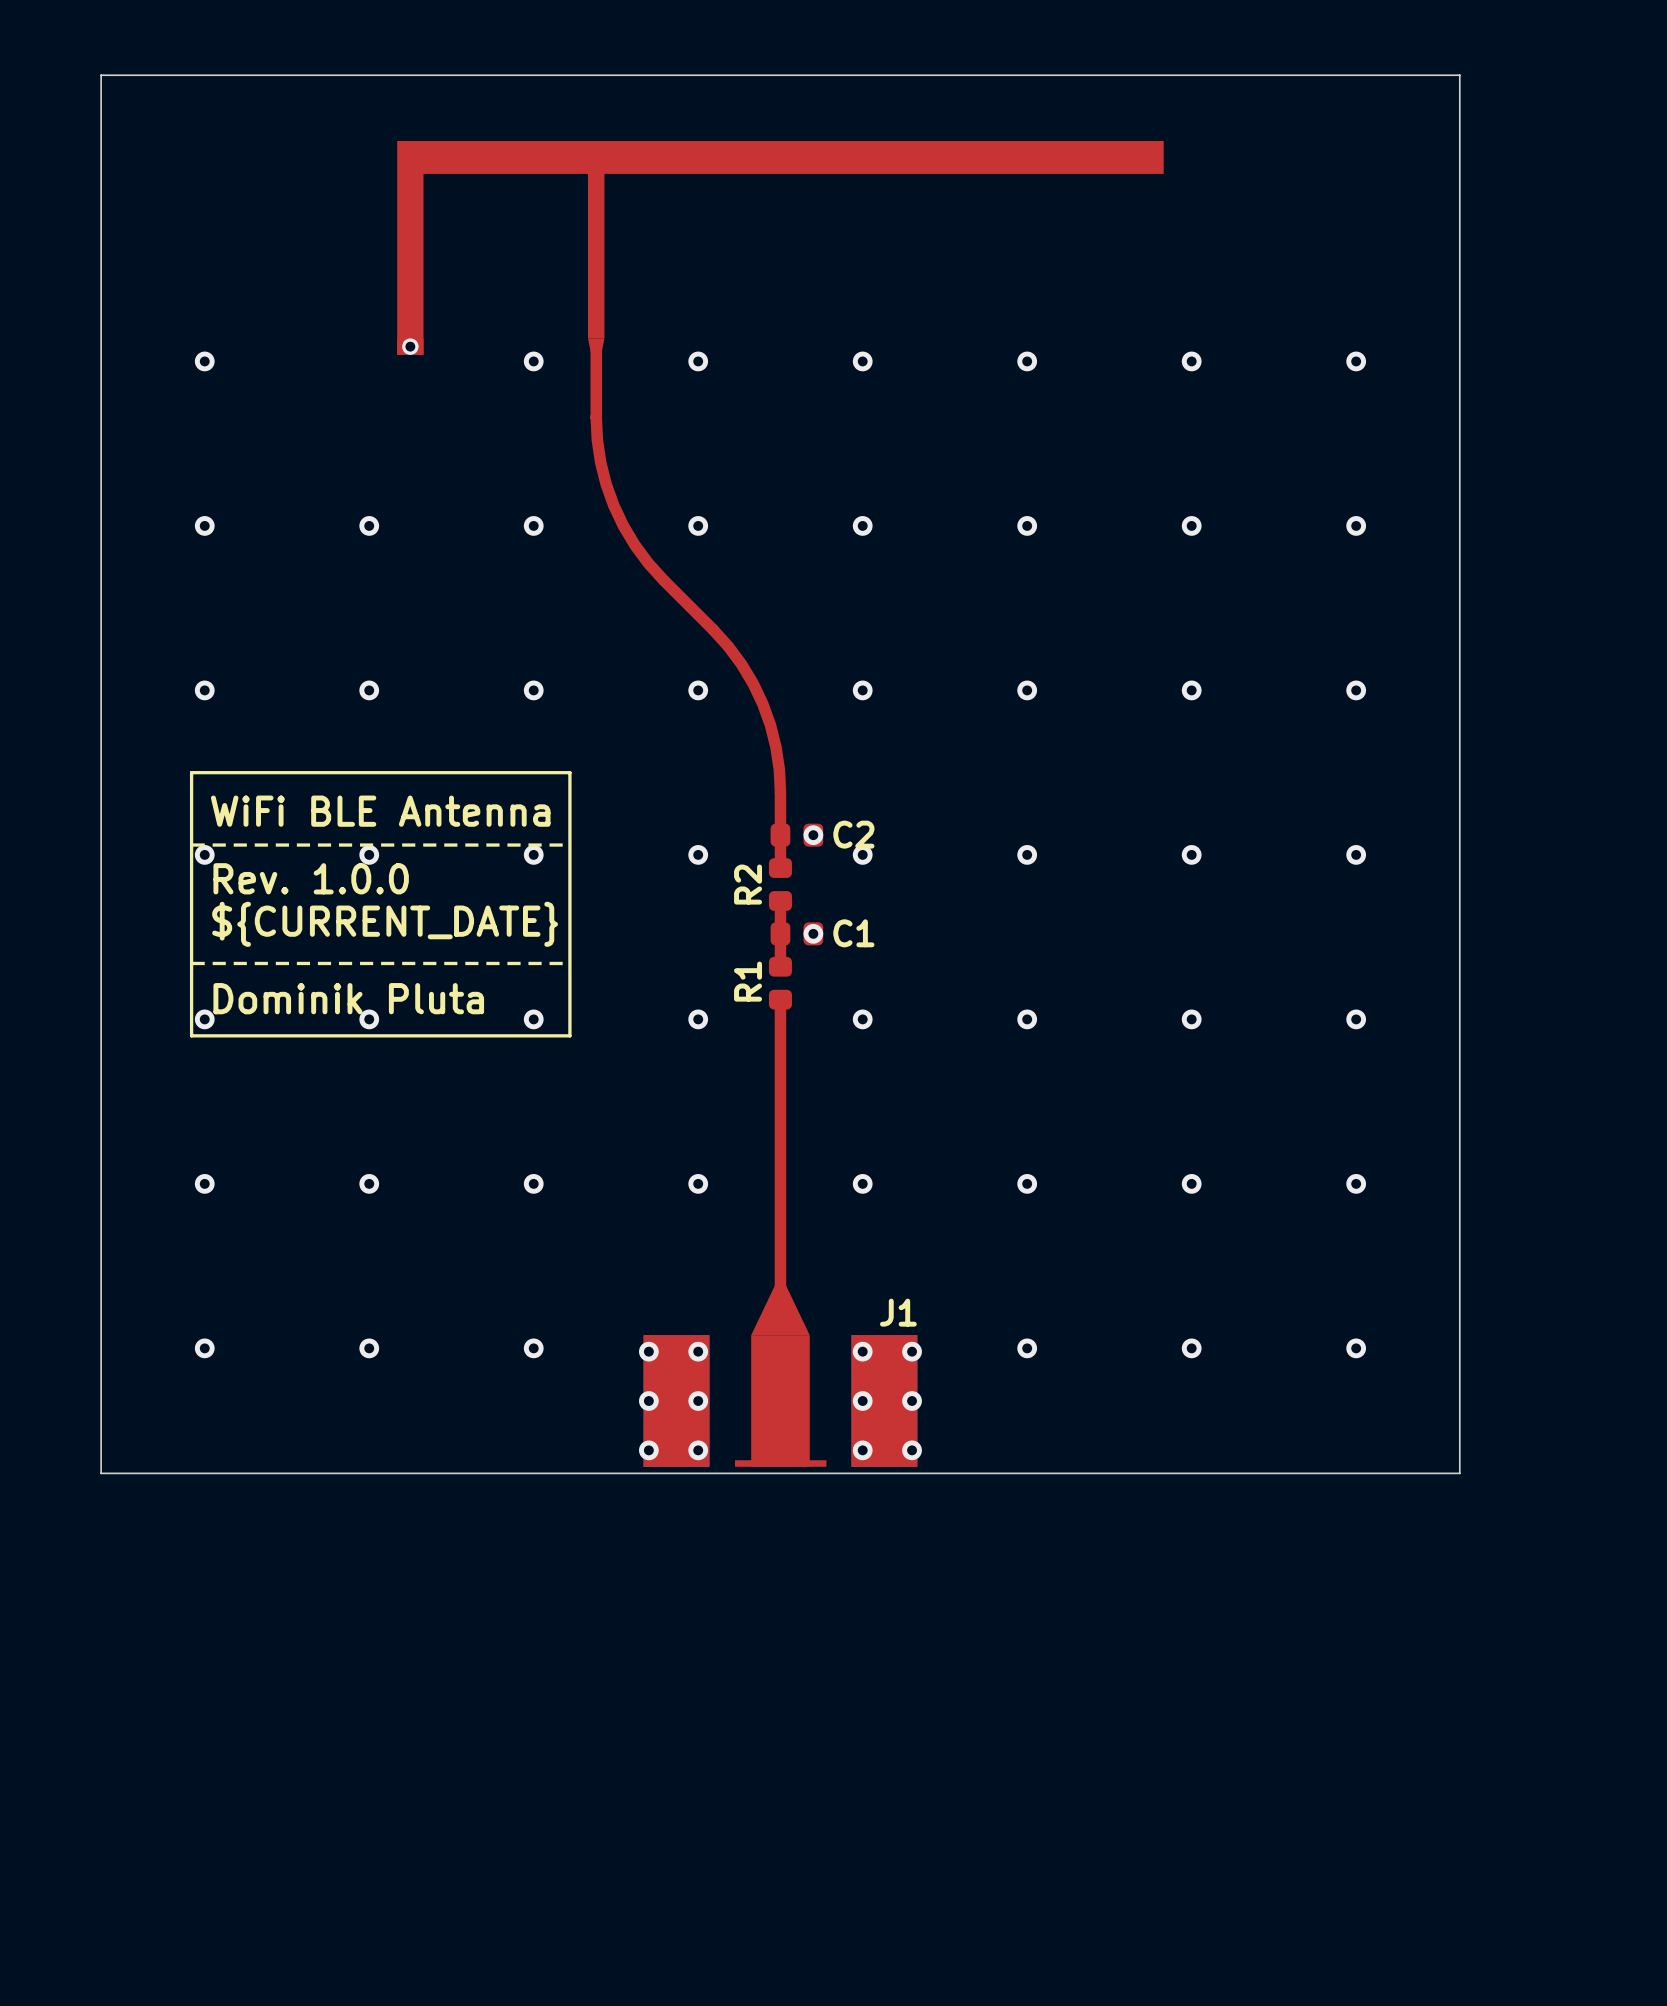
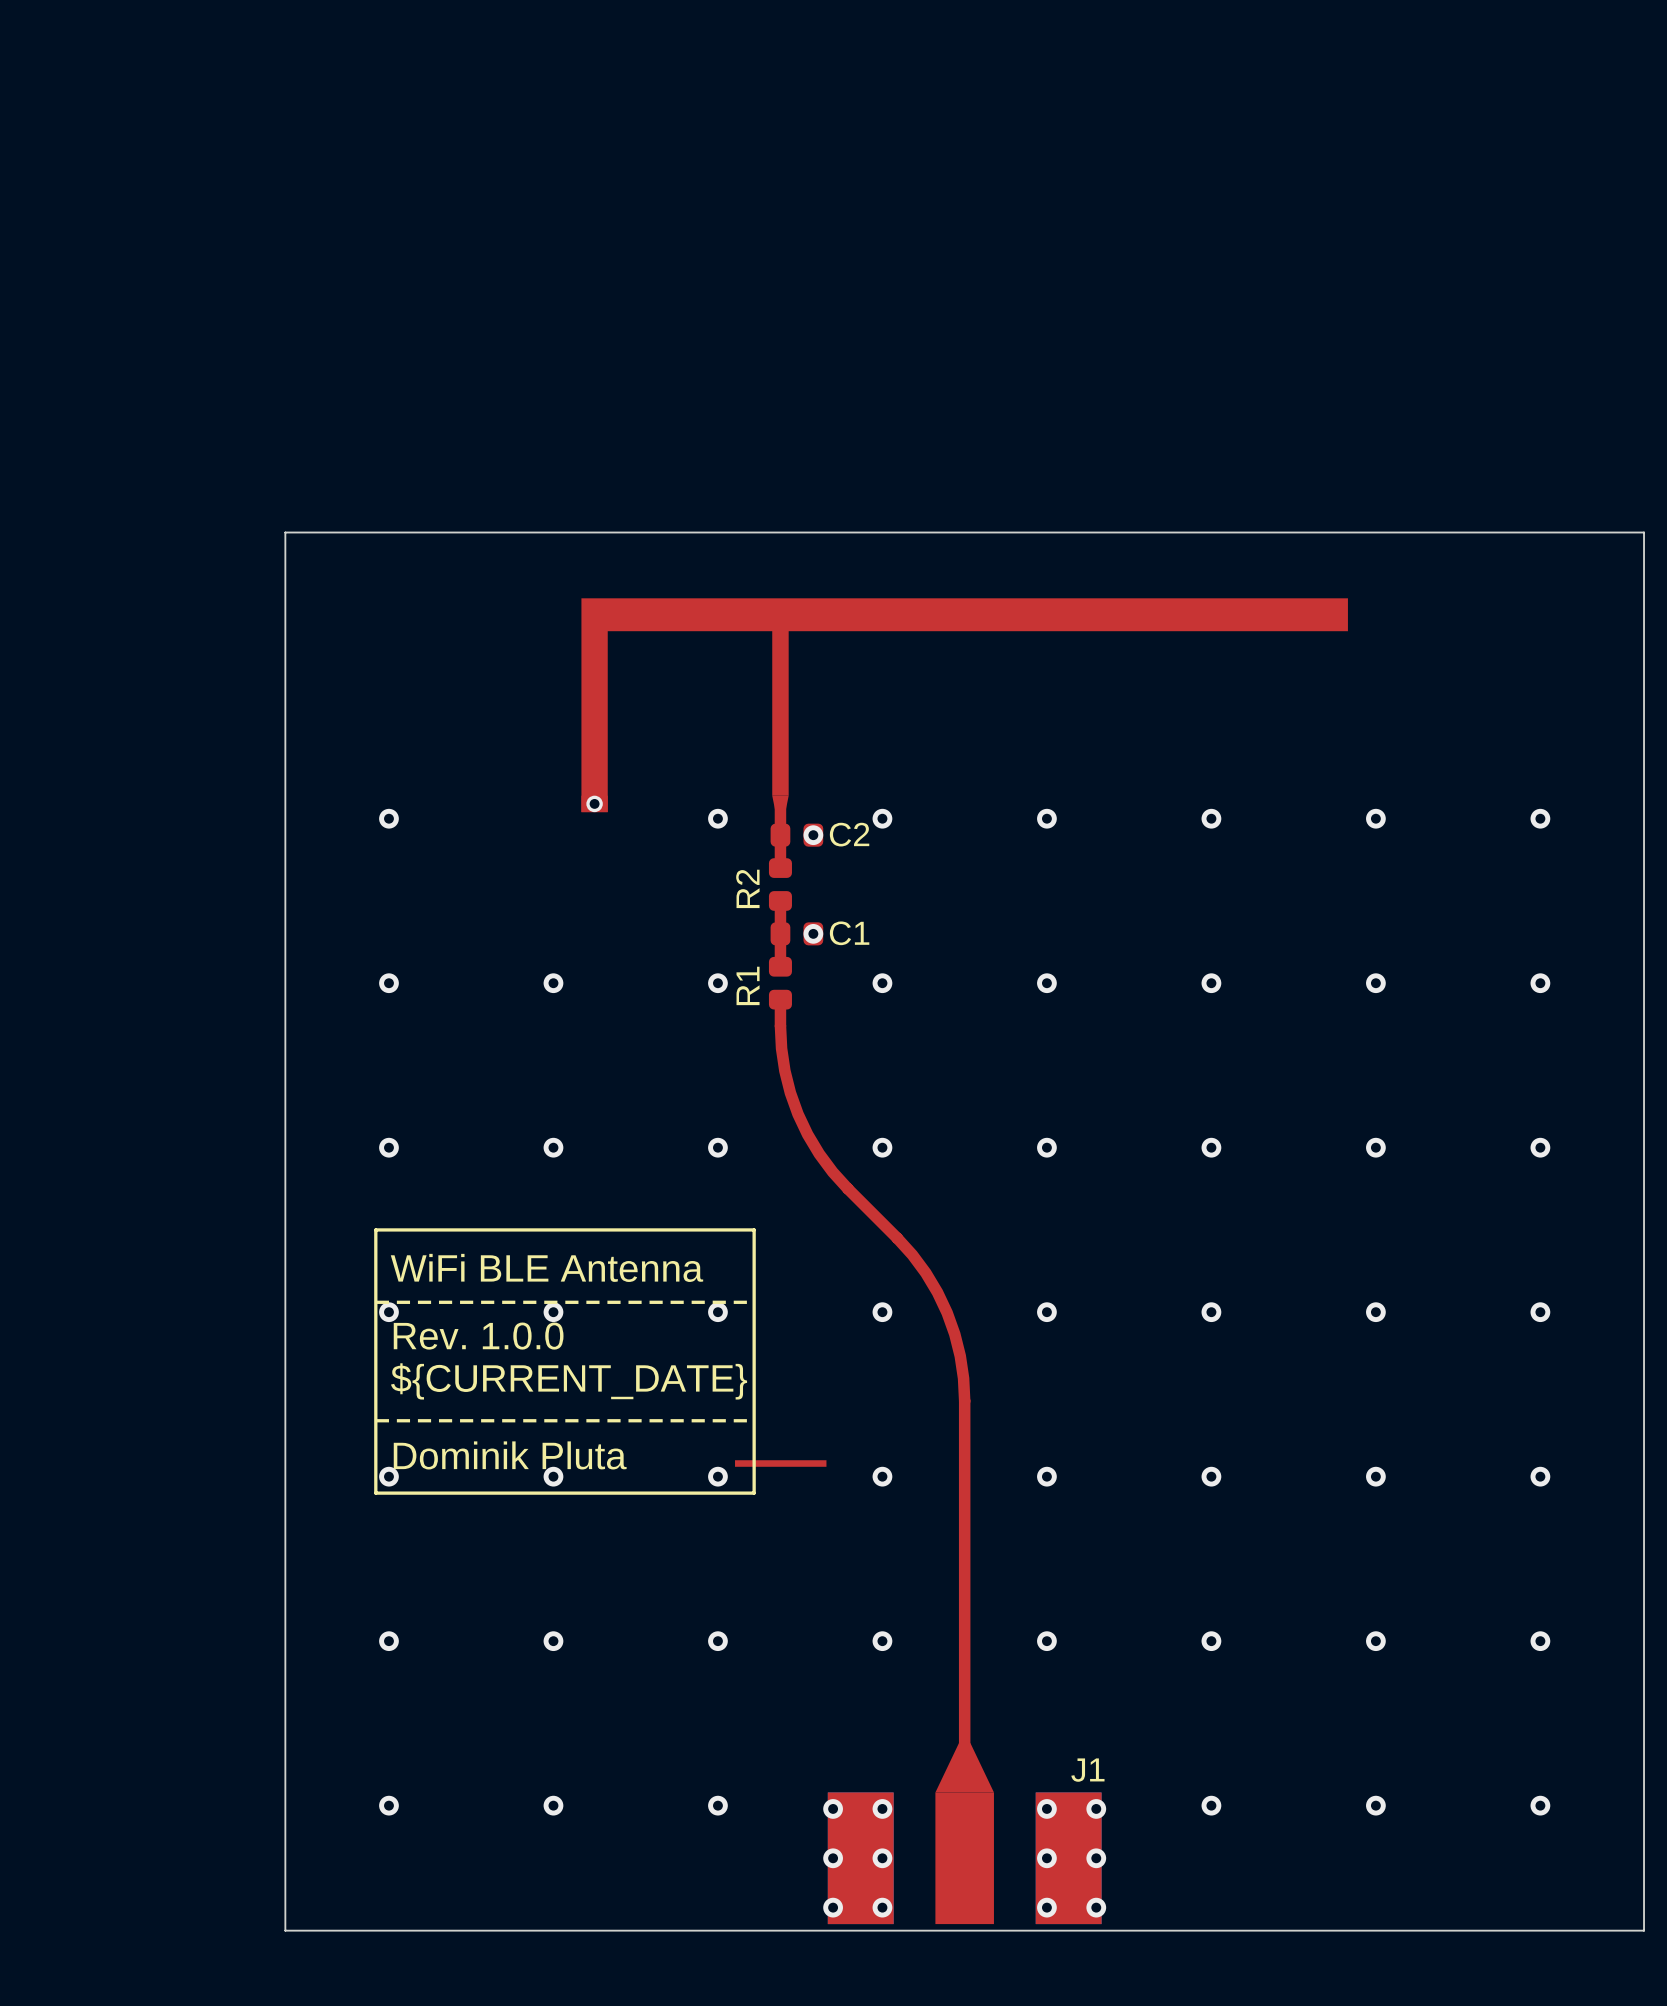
board edge: (101, 75) (1459, 75) (1459, 1473) (101, 1473) (101, 75) -> (285, 532) (1644, 532) (1644, 1930) (285, 1930) (285, 532)
part position: (780, 247) -> (964, 705)
via: (410, 346) -> none
top track: (596, 346) (597, 439) (600, 462) (613, 505) (635, 545) (648, 563) (728, 646) (753, 683) (762, 704) (776, 747) (779, 769) (780, 803) -> none
via: (204, 361) -> none
via: (533, 361) -> none
via: (698, 361) -> none
via: (862, 361) -> none
via: (1027, 361) -> none
via: (1191, 361) -> none
via: (1356, 361) -> none
via: (204, 525) -> none
via: (369, 525) -> none
via: (533, 525) -> none
via: (698, 525) -> none
via: (862, 525) -> none
via: (1027, 525) -> none
via: (1191, 525) -> none
via: (1356, 525) -> none
via: (204, 690) -> none
via: (369, 690) -> none
via: (533, 690) -> none
via: (698, 690) -> none
via: (862, 690) -> none
via: (1027, 690) -> none
via: (1191, 690) -> none
via: (1356, 690) -> none
line: (191, 772) (569, 772) (569, 1035) (191, 1035) (191, 772) -> (375, 1229) (754, 1229) (754, 1493) (375, 1493) (375, 1229)
via: none -> (594, 803)
text position: WiFi BLE Antenna (380, 811) -> WiFi BLE Antenna (546, 1267)
via: none -> (1540, 818)
line: (191, 845) (569, 845) -> (375, 1302) (754, 1302)
via: (204, 854) -> none
via position: (369, 854) -> (388, 818)
via: (533, 854) -> none
via position: (698, 854) -> (717, 818)
via position: (862, 854) -> (882, 818)
via position: (1027, 854) -> (1046, 818)
via position: (1191, 854) -> (1211, 818)
via position: (1356, 854) -> (1375, 818)
text position: Rev. 1.0.0 (311, 878) -> Rev. 1.0.0 (478, 1336)
text position: ${CURRENT_DATE} (385, 924) -> ${CURRENT_DATE} (569, 1381)
line: (191, 963) (569, 963) -> (375, 1420) (754, 1420)
via: none -> (1540, 983)
text position: Dominik Pluta (348, 998) -> Dominik Pluta (510, 1455)
via: (204, 1019) -> none
via position: (369, 1019) -> (388, 983)
via position: (533, 1019) -> (553, 983)
via position: (698, 1019) -> (717, 983)
via position: (862, 1019) -> (882, 983)
via position: (1027, 1019) -> (1046, 983)
via position: (1191, 1019) -> (1211, 983)
via position: (1356, 1019) -> (1375, 983)
top track: (780, 1025) (780, 1318) -> (780, 1025) (781, 1048) (790, 1092) (807, 1134) (832, 1172) (897, 1238) (925, 1273) (947, 1312) (960, 1356) (964, 1400) (964, 1776)
via: none -> (1540, 1147)
via: (204, 1183) -> none
via position: (369, 1183) -> (388, 1147)
via position: (533, 1183) -> (553, 1147)
via position: (698, 1183) -> (717, 1147)
via position: (862, 1183) -> (882, 1147)
via position: (1027, 1183) -> (1046, 1147)
via position: (1191, 1183) -> (1211, 1147)
via position: (1356, 1183) -> (1375, 1147)
drawing position: (780, 1310) -> (964, 1767)
via: none -> (717, 1312)
via: none -> (882, 1312)
via: none -> (1540, 1312)
via: (204, 1348) -> none
via position: (369, 1348) -> (388, 1312)
via position: (533, 1348) -> (553, 1312)
via position: (1027, 1348) -> (1046, 1312)
via position: (1191, 1348) -> (1211, 1312)
via position: (1356, 1348) -> (1375, 1312)
via: (648, 1351) -> none
via: (698, 1351) -> none
via: (862, 1351) -> none
via: (912, 1351) -> none
via: (648, 1401) -> none
via: (698, 1401) -> none
J1 position: (780, 1401) -> (964, 1858)
via: (862, 1401) -> none
via: (912, 1401) -> none
via: (648, 1450) -> none
via position: (698, 1450) -> (717, 1476)
via: (862, 1450) -> none
via: (912, 1450) -> none
via: none -> (388, 1476)
via: none -> (553, 1476)
via: none -> (882, 1476)
via: none -> (1046, 1476)
via: none -> (1211, 1476)
via: none -> (1375, 1476)
via: none -> (1540, 1476)
via: none -> (388, 1641)
via: none -> (553, 1641)
via: none -> (717, 1641)
via: none -> (882, 1641)
via: none -> (1046, 1641)
via: none -> (1211, 1641)
via: none -> (1375, 1641)
via: none -> (1540, 1641)
via: none -> (388, 1805)
via: none -> (553, 1805)
via: none -> (717, 1805)
via: none -> (1211, 1805)
via: none -> (1375, 1805)
via: none -> (1540, 1805)
via: none -> (833, 1808)
via: none -> (882, 1808)
via: none -> (1046, 1808)
via: none -> (1096, 1808)
via: none -> (833, 1858)
via: none -> (882, 1858)
via: none -> (1046, 1858)
via: none -> (1096, 1858)
via: none -> (833, 1907)
via: none -> (882, 1907)
via: none -> (1046, 1907)
via: none -> (1096, 1907)

